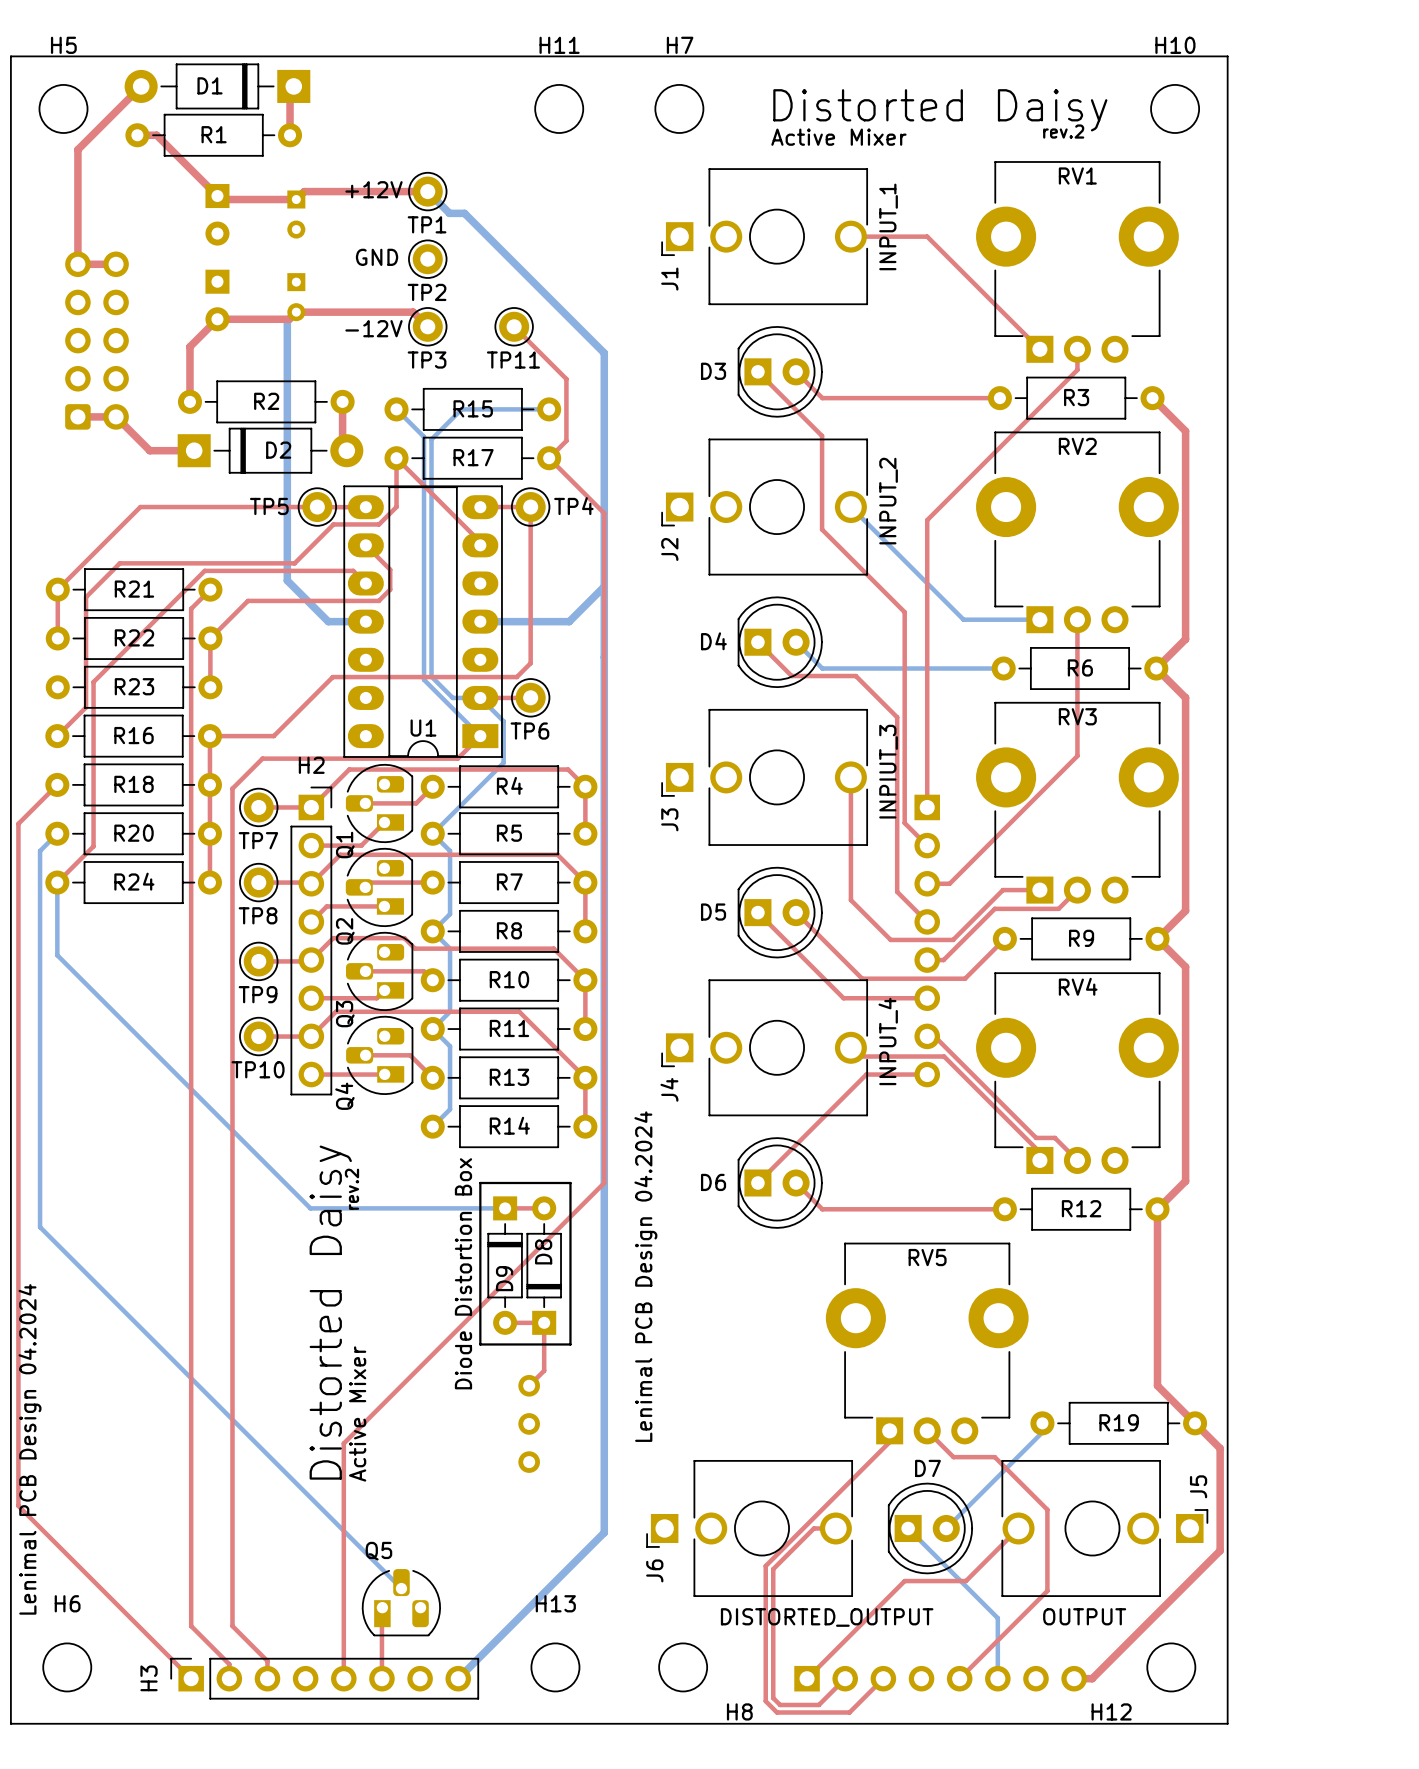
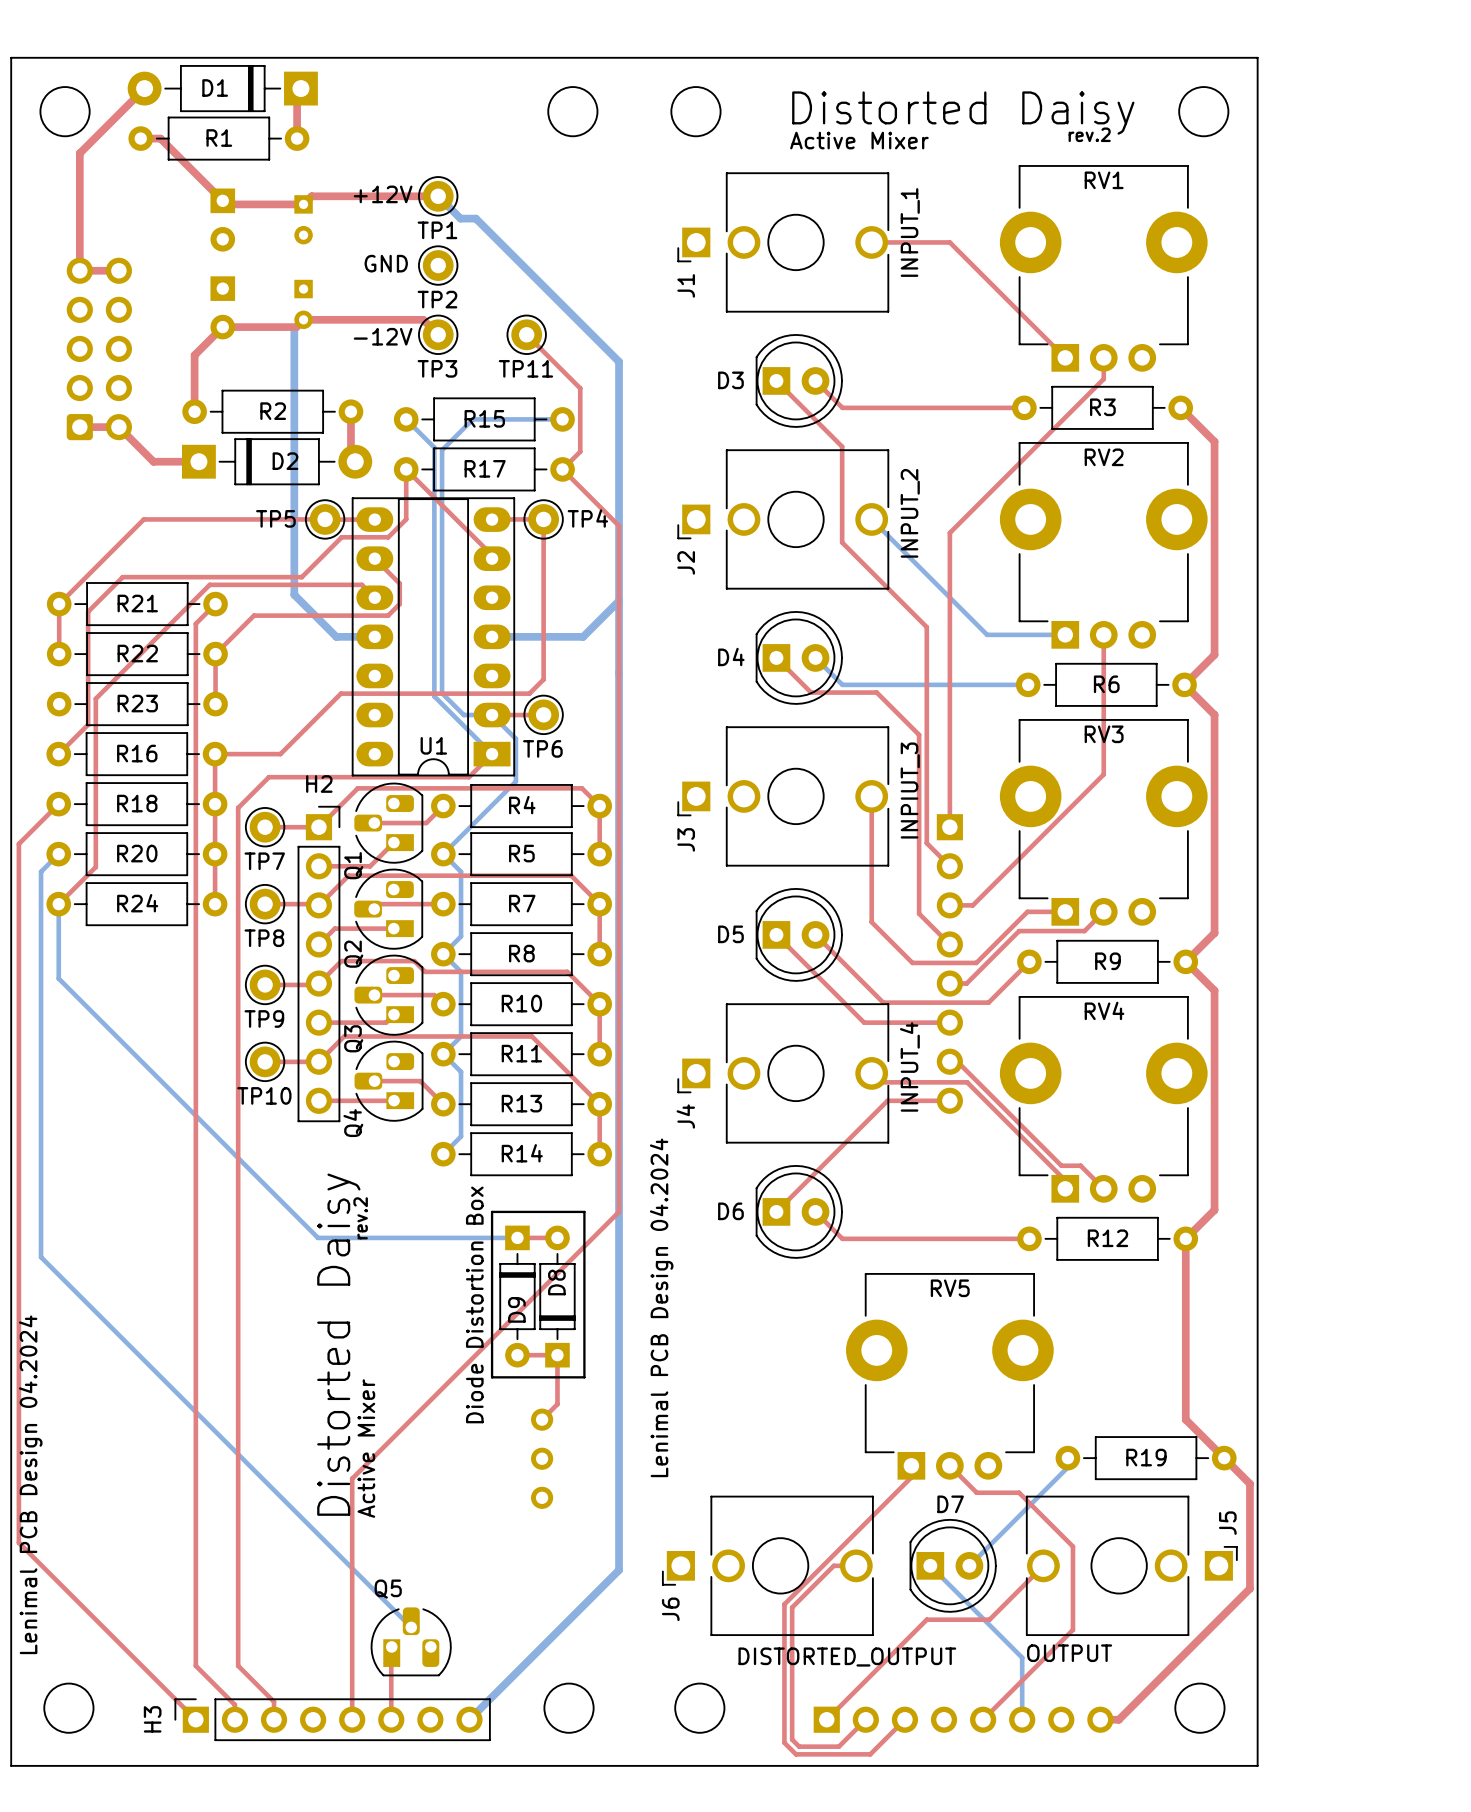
H5 name: H5 (63, 45) -> none
H11 name: H11 (559, 45) -> none
H7 name: H7 (680, 45) -> none
H10 name: H10 (1175, 45) -> none
H6 name: H6 (67, 1603) -> none
H13 name: H13 (555, 1603) -> none
text position: OUTPUT (1084, 1616) -> OUTPUT (1069, 1653)
H8 name: H8 (739, 1711) -> none
H12 name: H12 (1111, 1711) -> none

